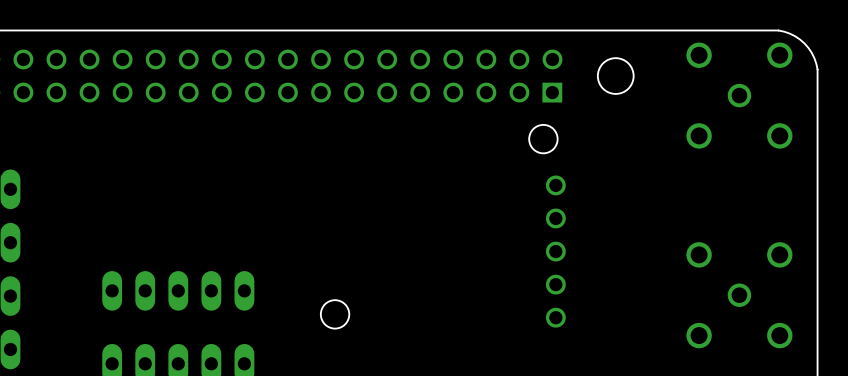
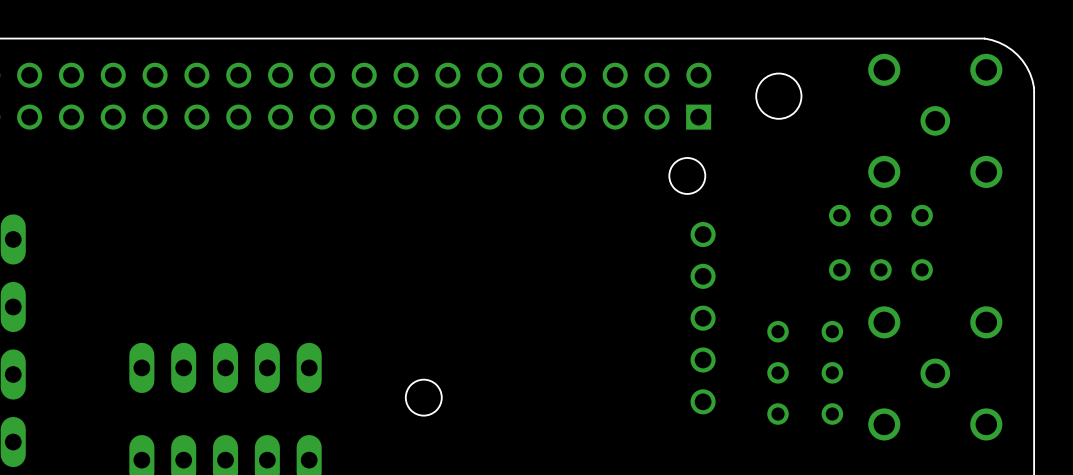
part: none -> (880, 242)
part: none -> (805, 372)

